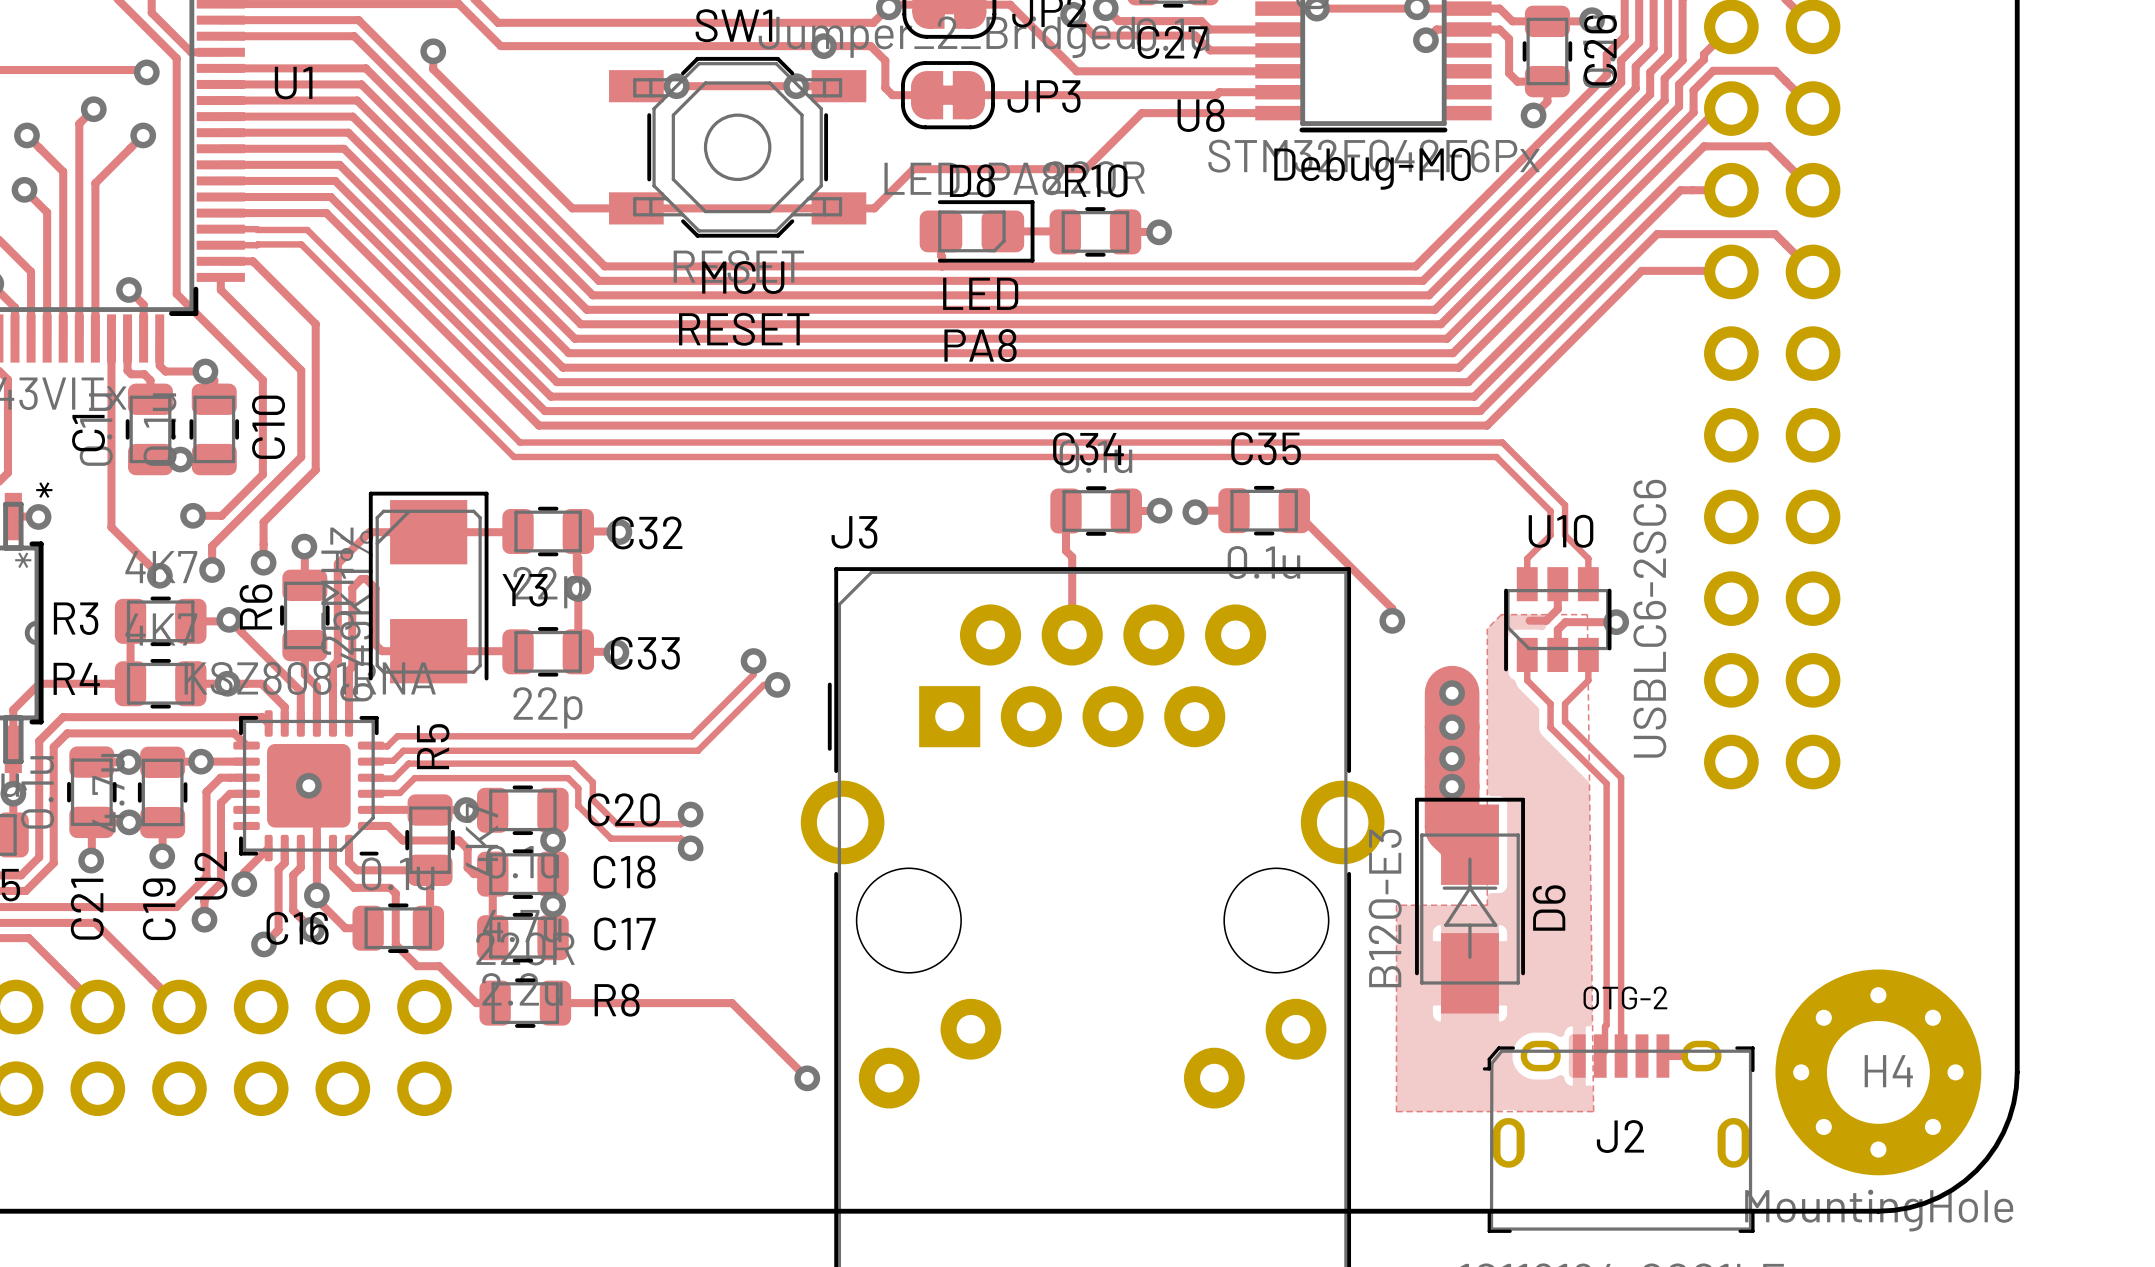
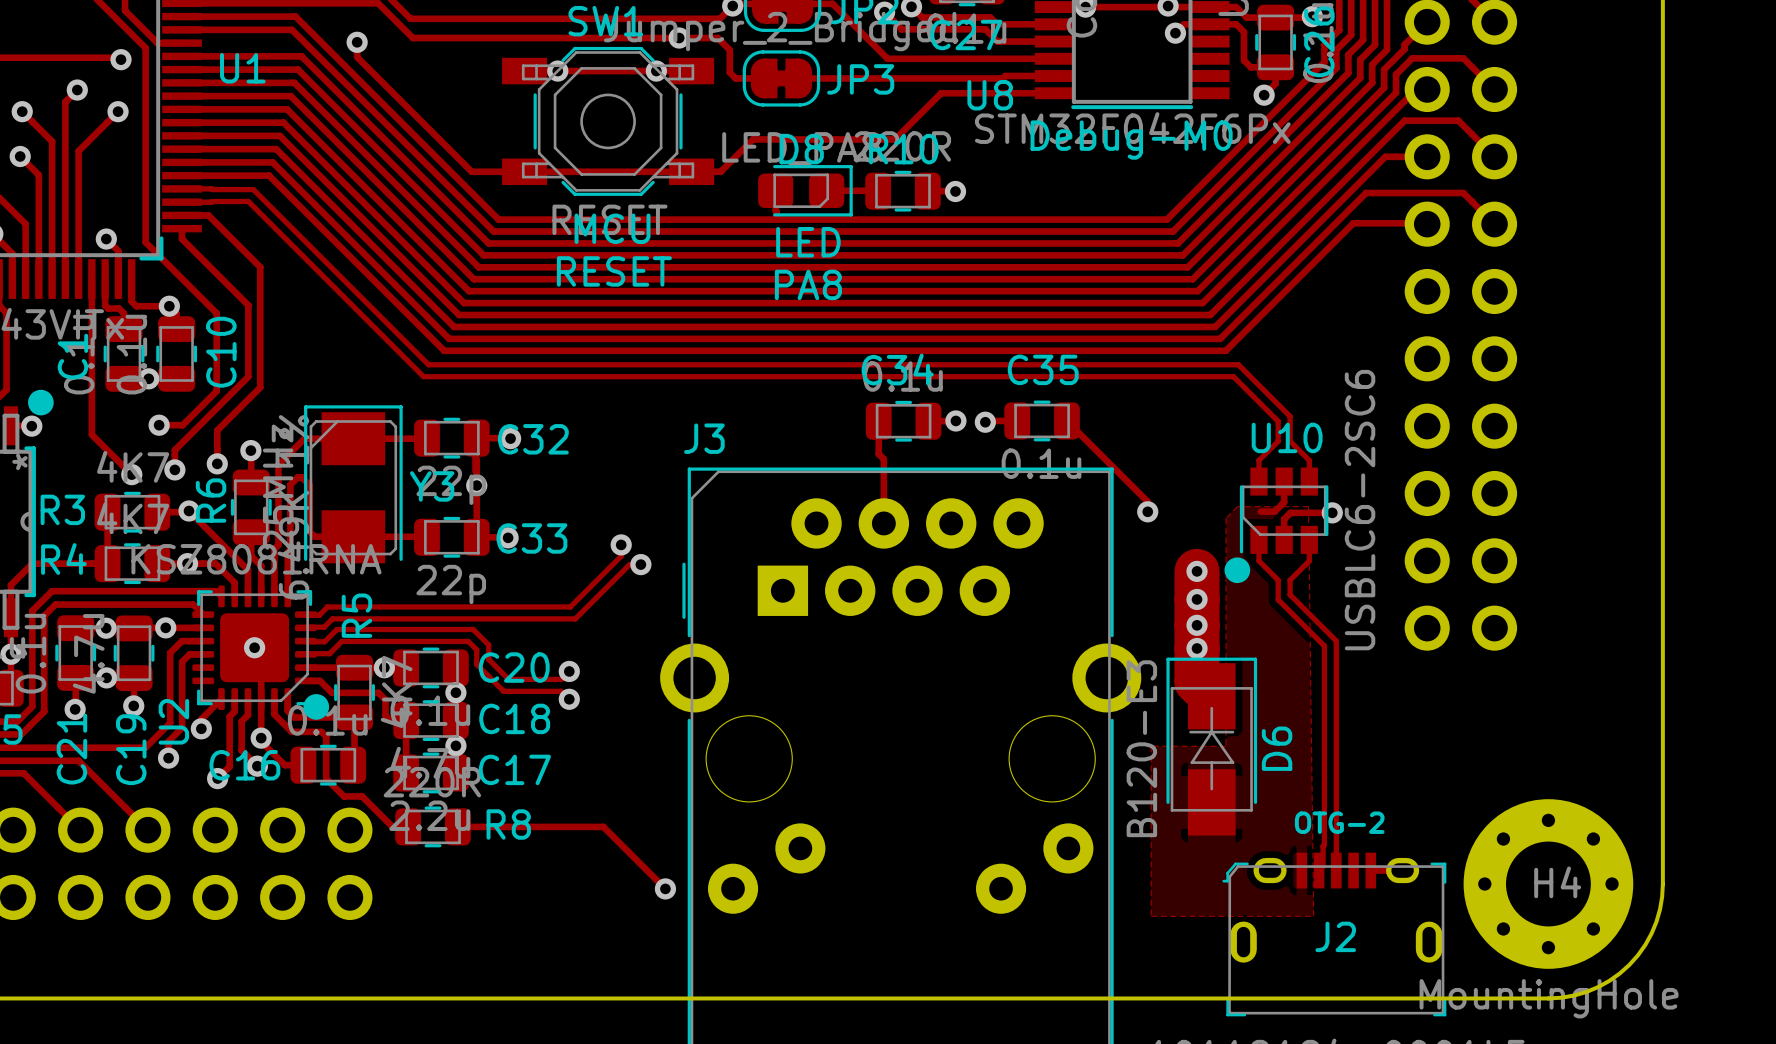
drawing: none -> [28, 389, 54, 416]
drawing: none -> [1224, 557, 1251, 584]
drawing: none -> [303, 694, 330, 720]

